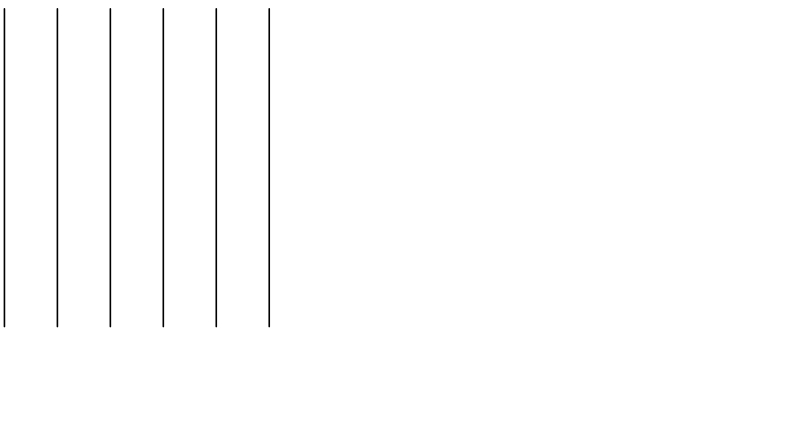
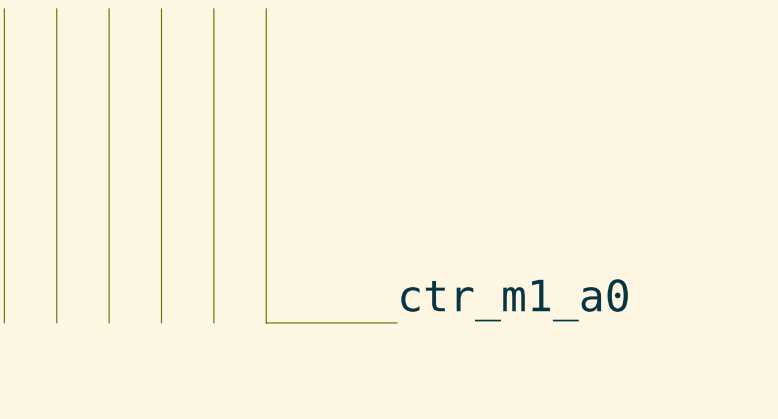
label: none -> ctr_m1_a0 (514, 300)
wire: none -> (266, 322) (397, 322)

